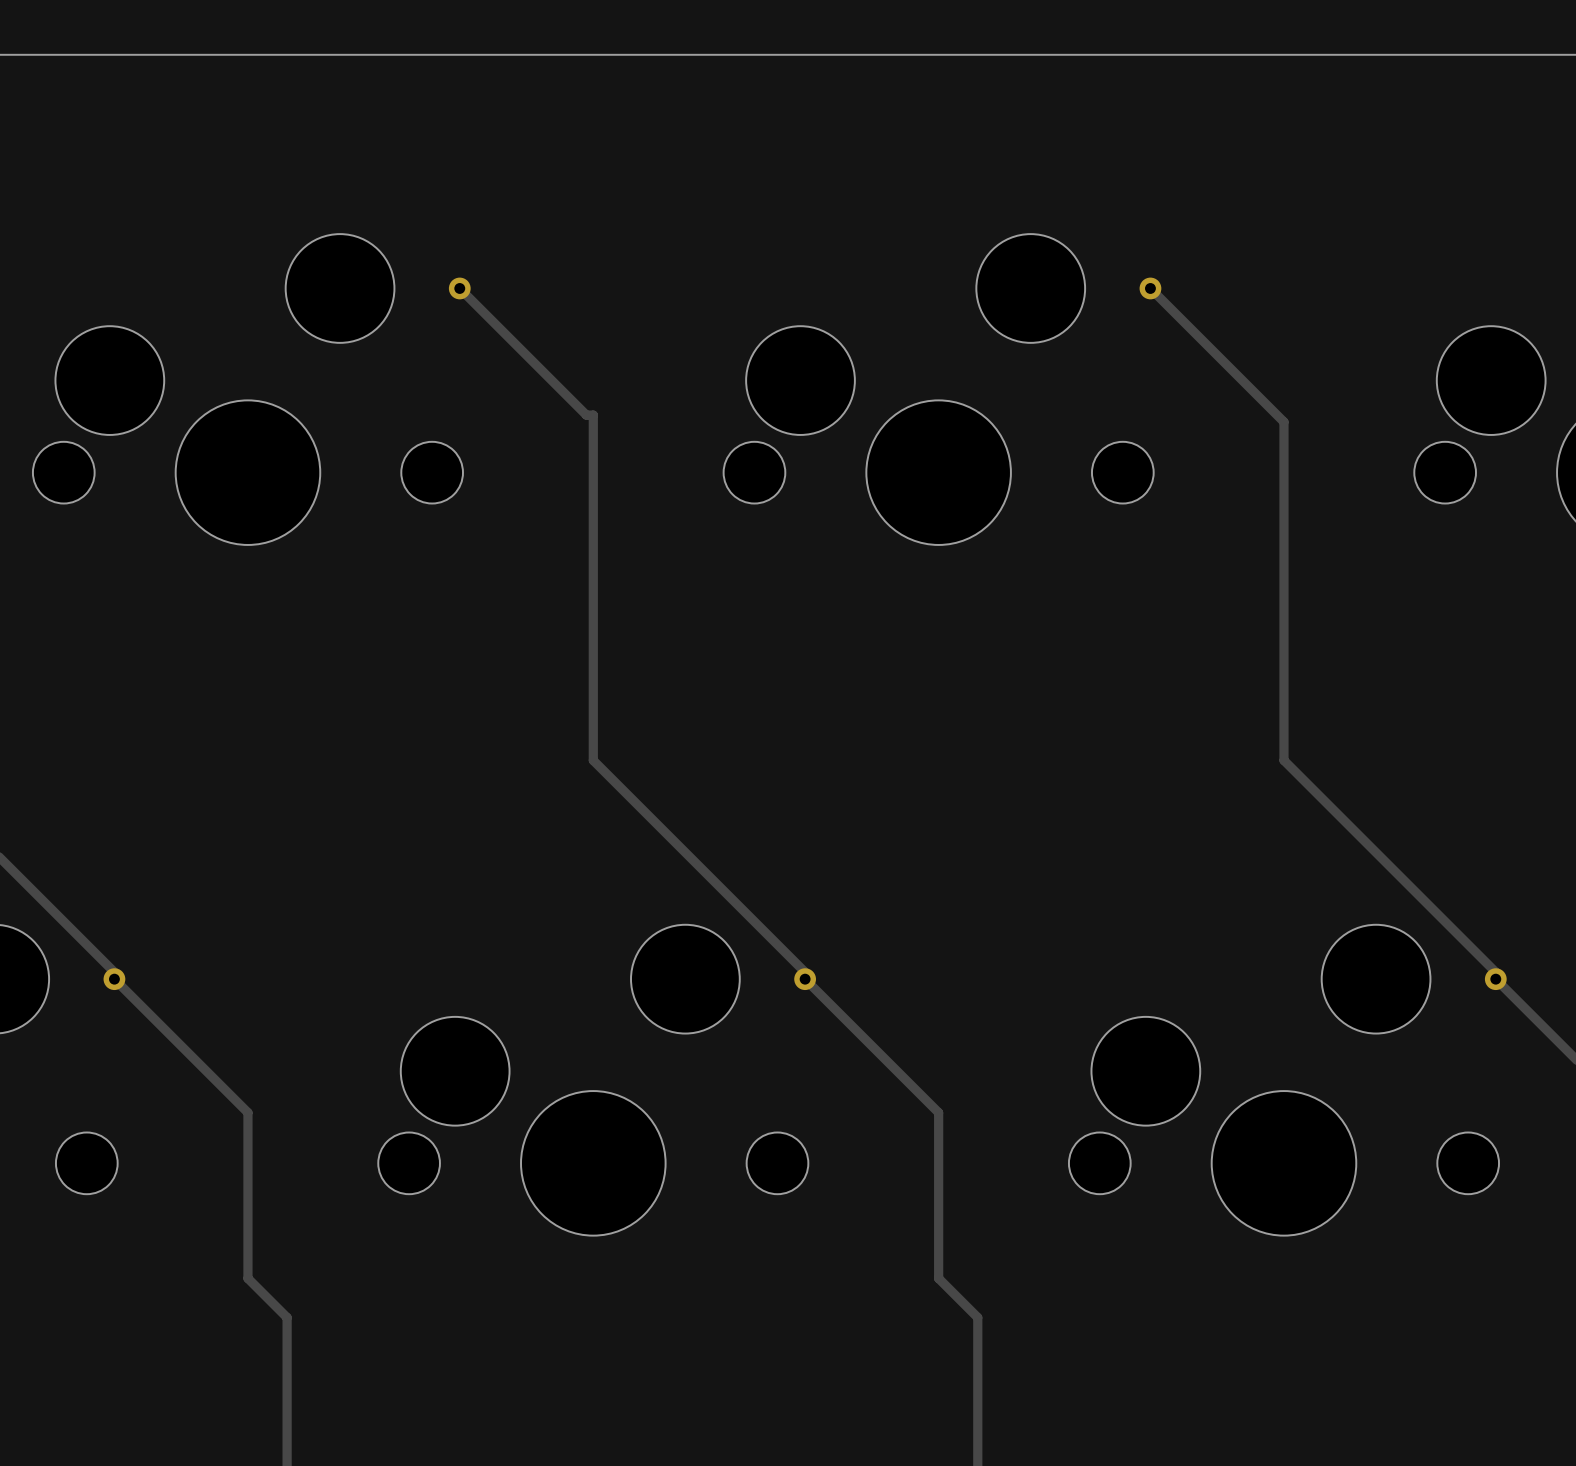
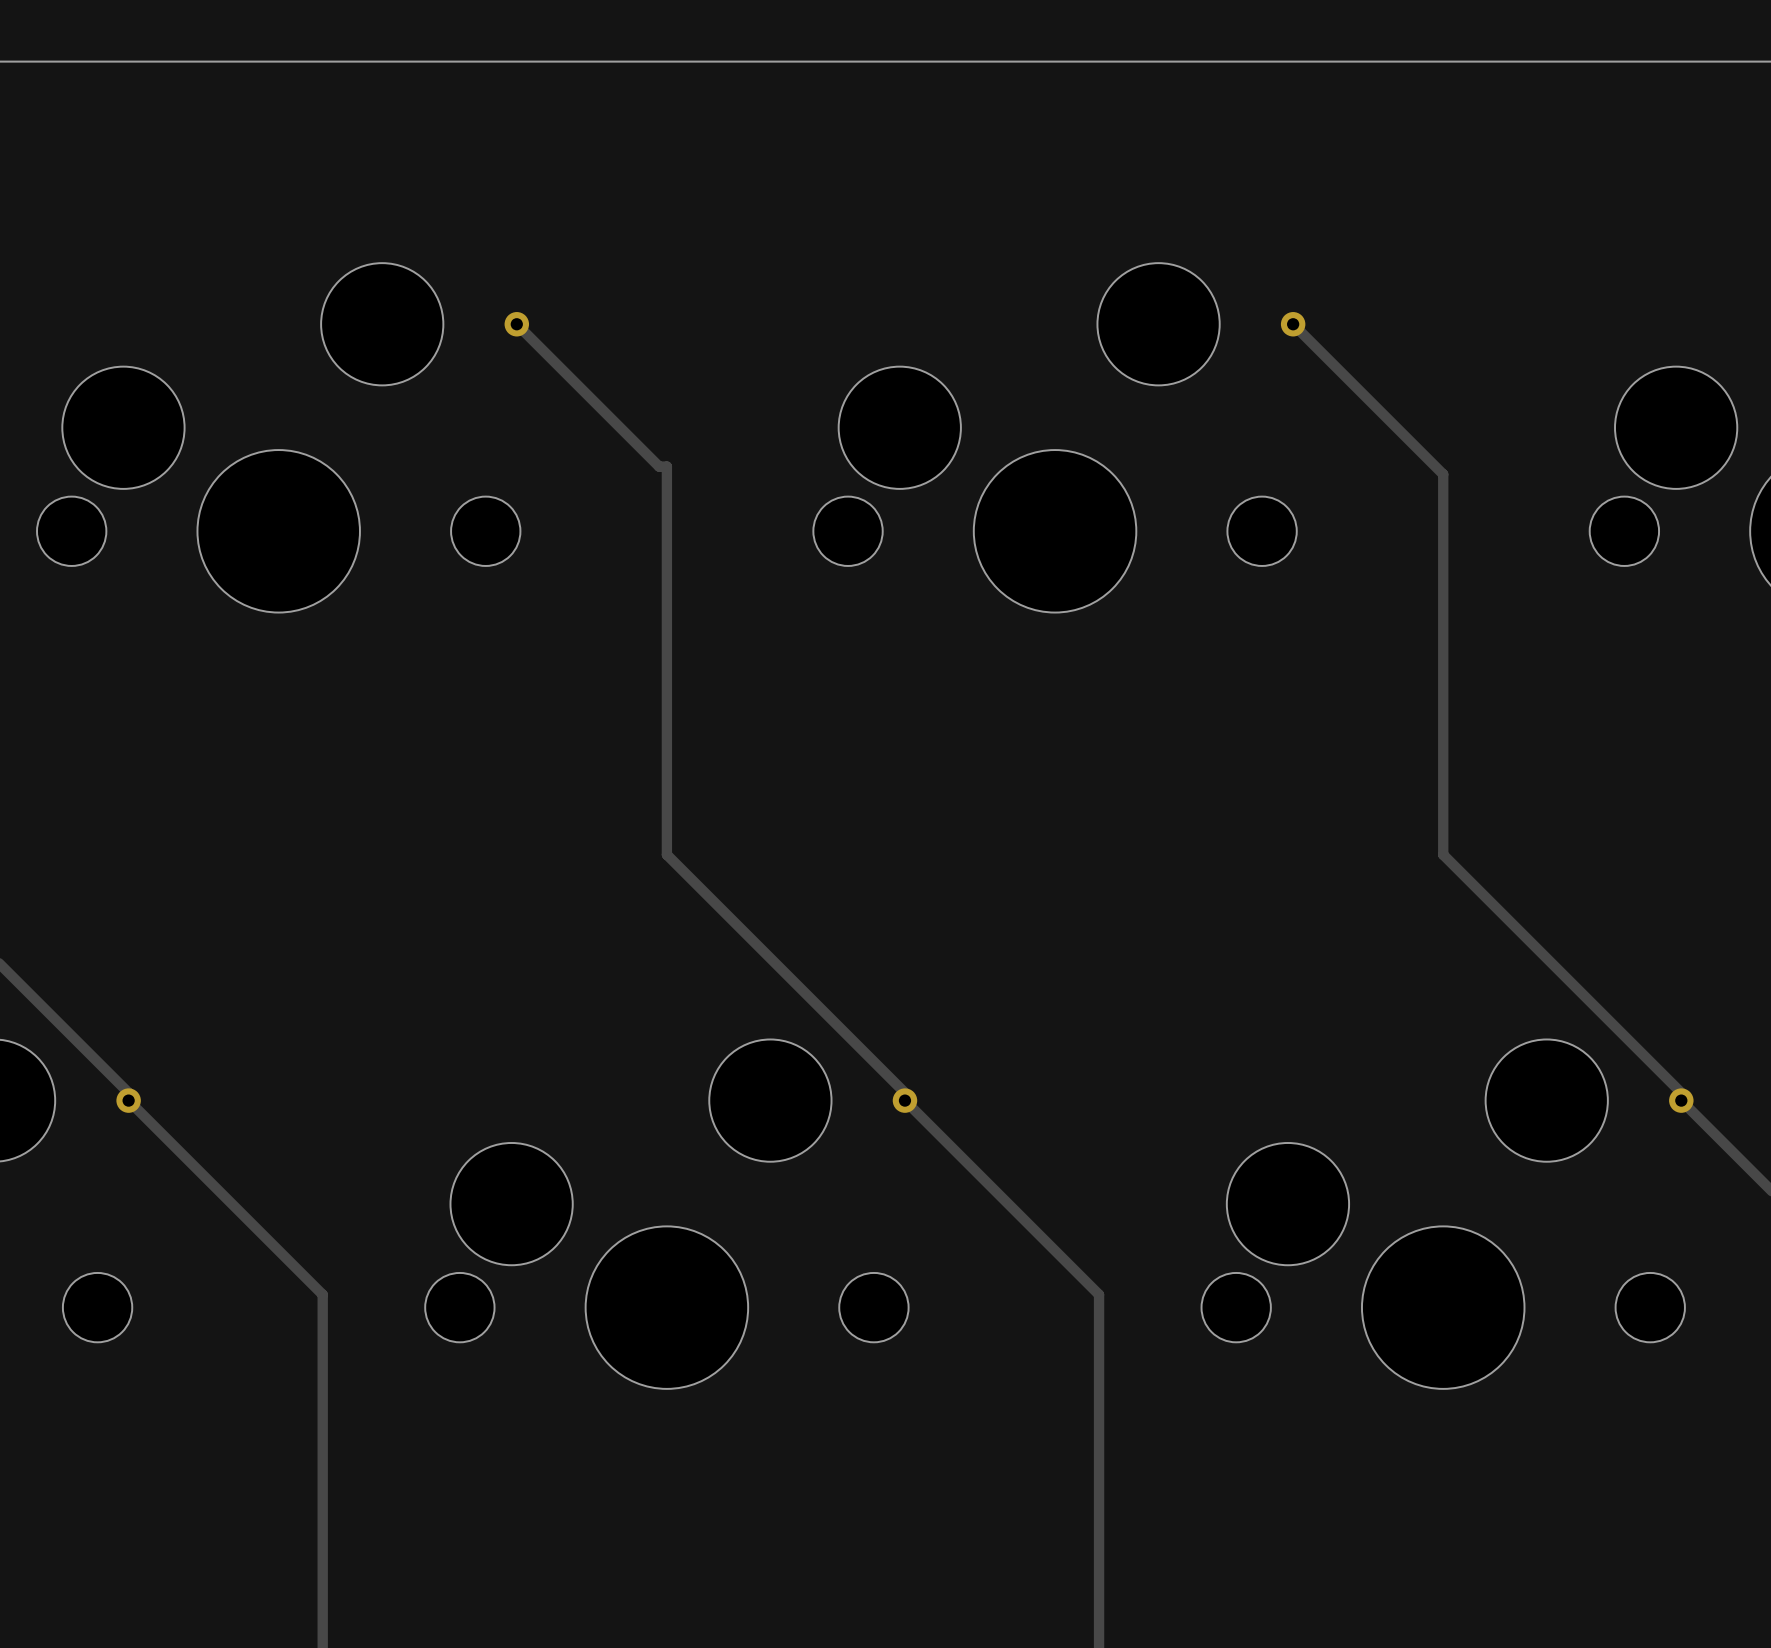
track: (247, 1112) (247, 1278) (287, 1317) -> (278, 1250) (322, 1294) (322, 1481)
track: (938, 1112) (938, 1278) (977, 1317) -> (1055, 1250) (1099, 1294) (1099, 1481)

